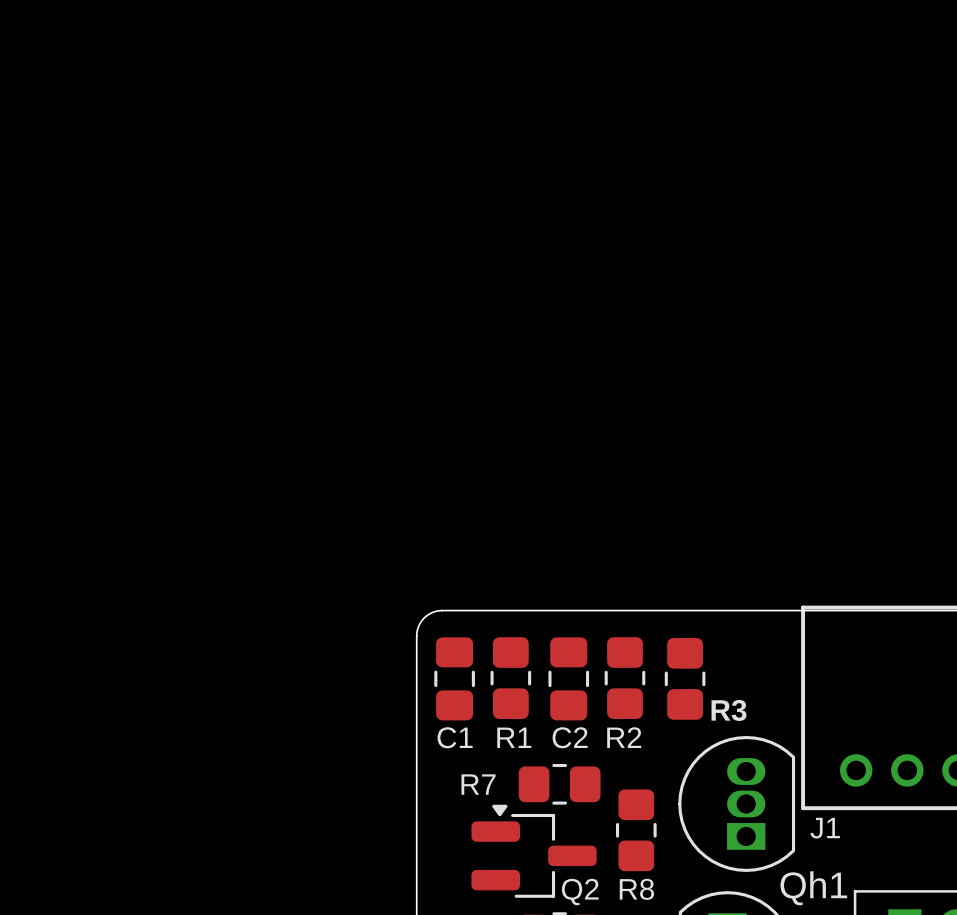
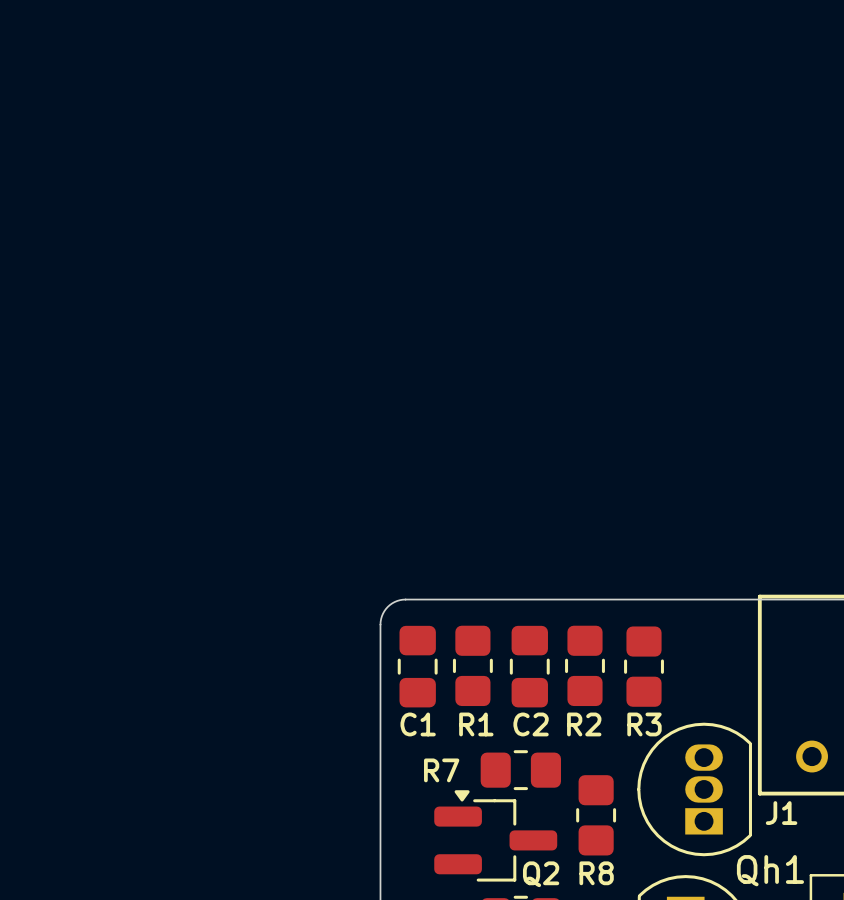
R3 name position: R3 (728, 710) -> R3 (644, 724)

